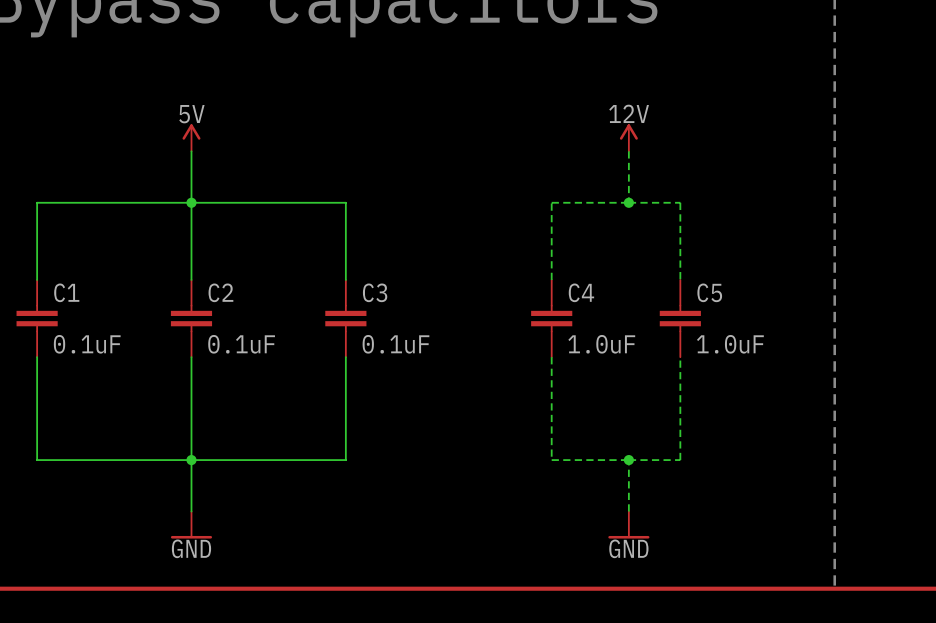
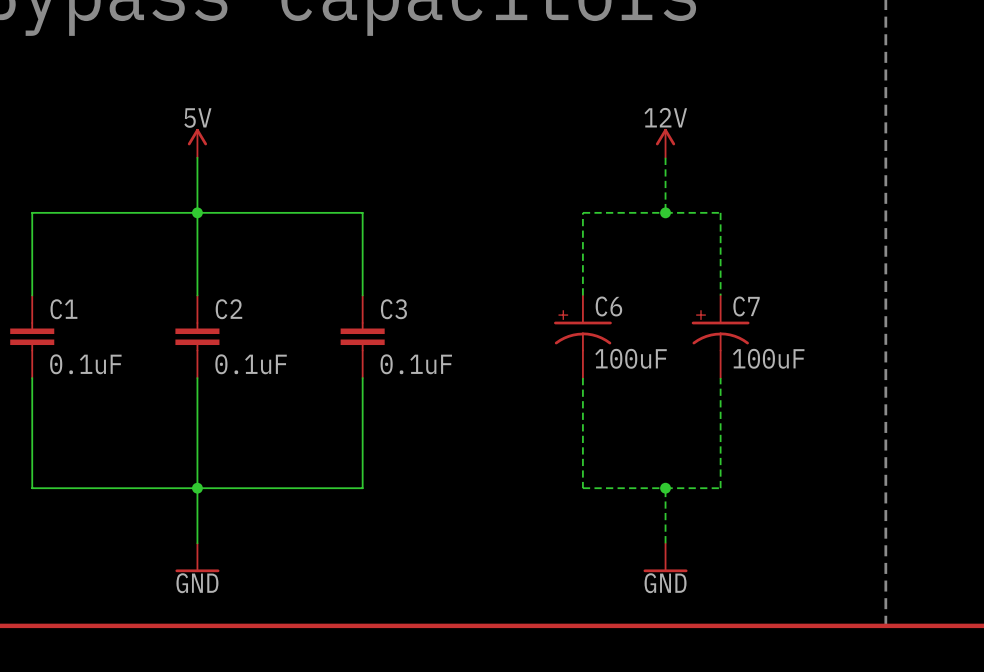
C4: 1.0uF (551, 318) -> none
C6: none -> 100uF (582, 336)
C5: 1.0uF (680, 318) -> none
C7: none -> 100uF (720, 336)

